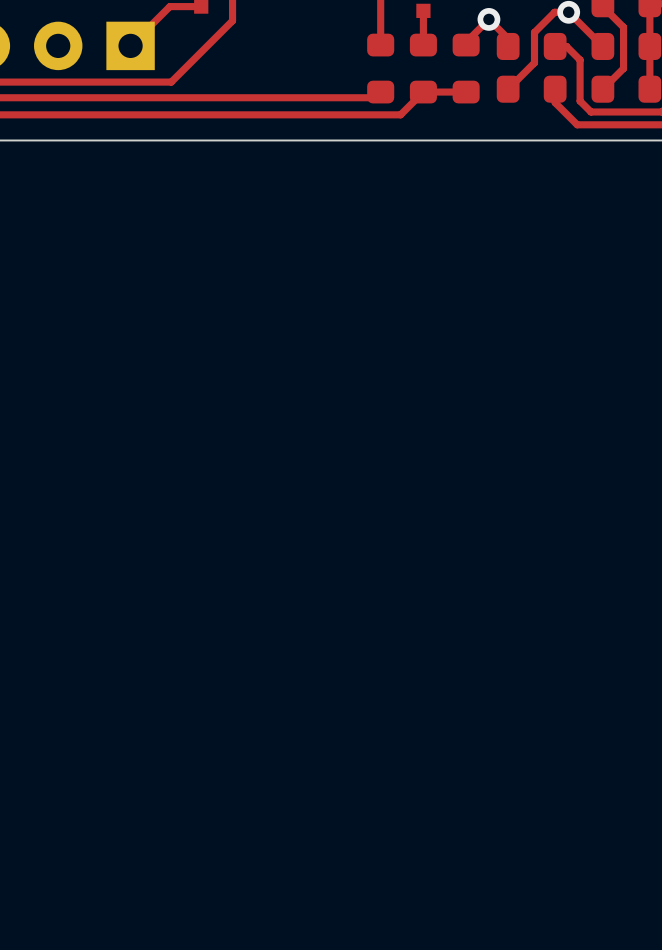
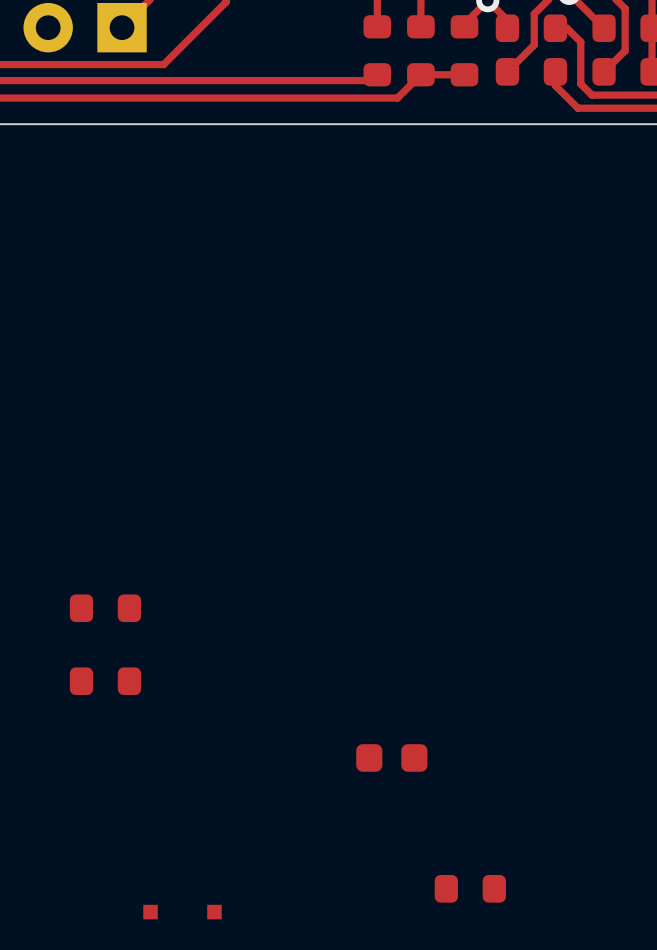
part: none -> (105, 608)
part: none -> (105, 681)
part: none -> (391, 757)
part: none -> (470, 888)
part: none -> (182, 912)

